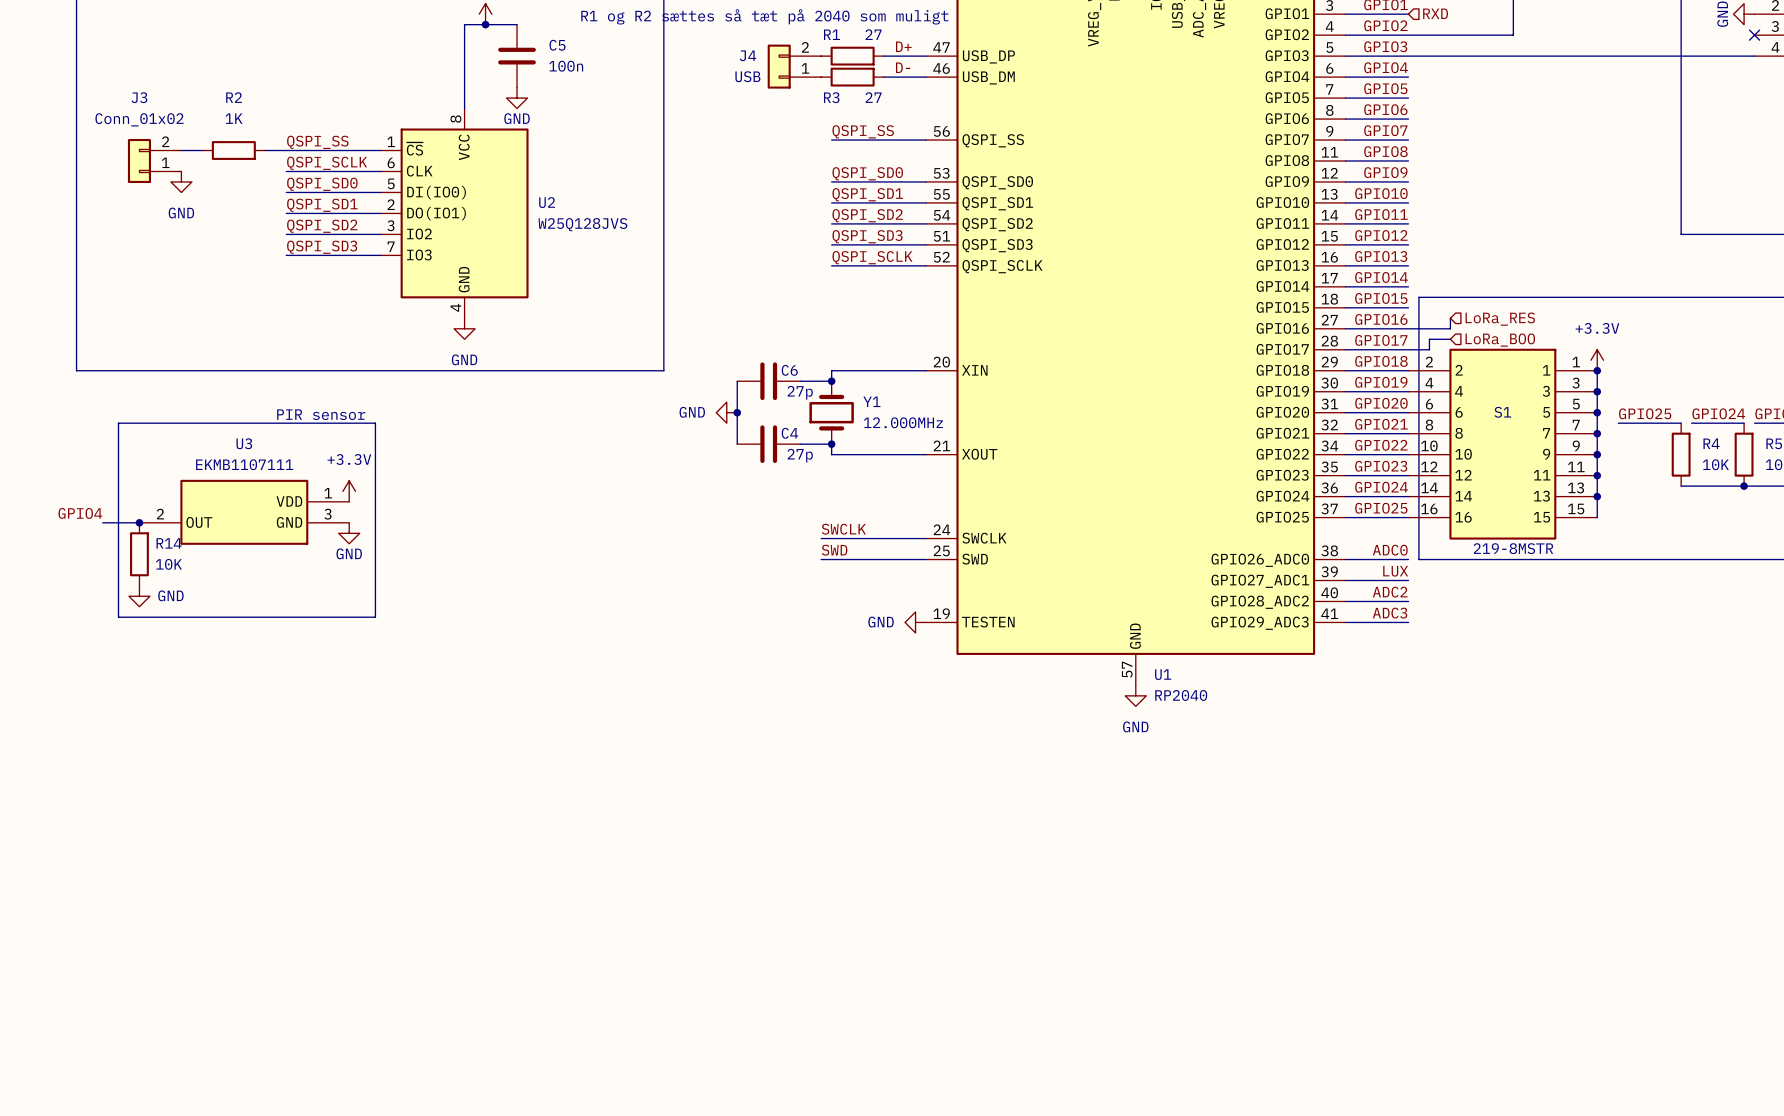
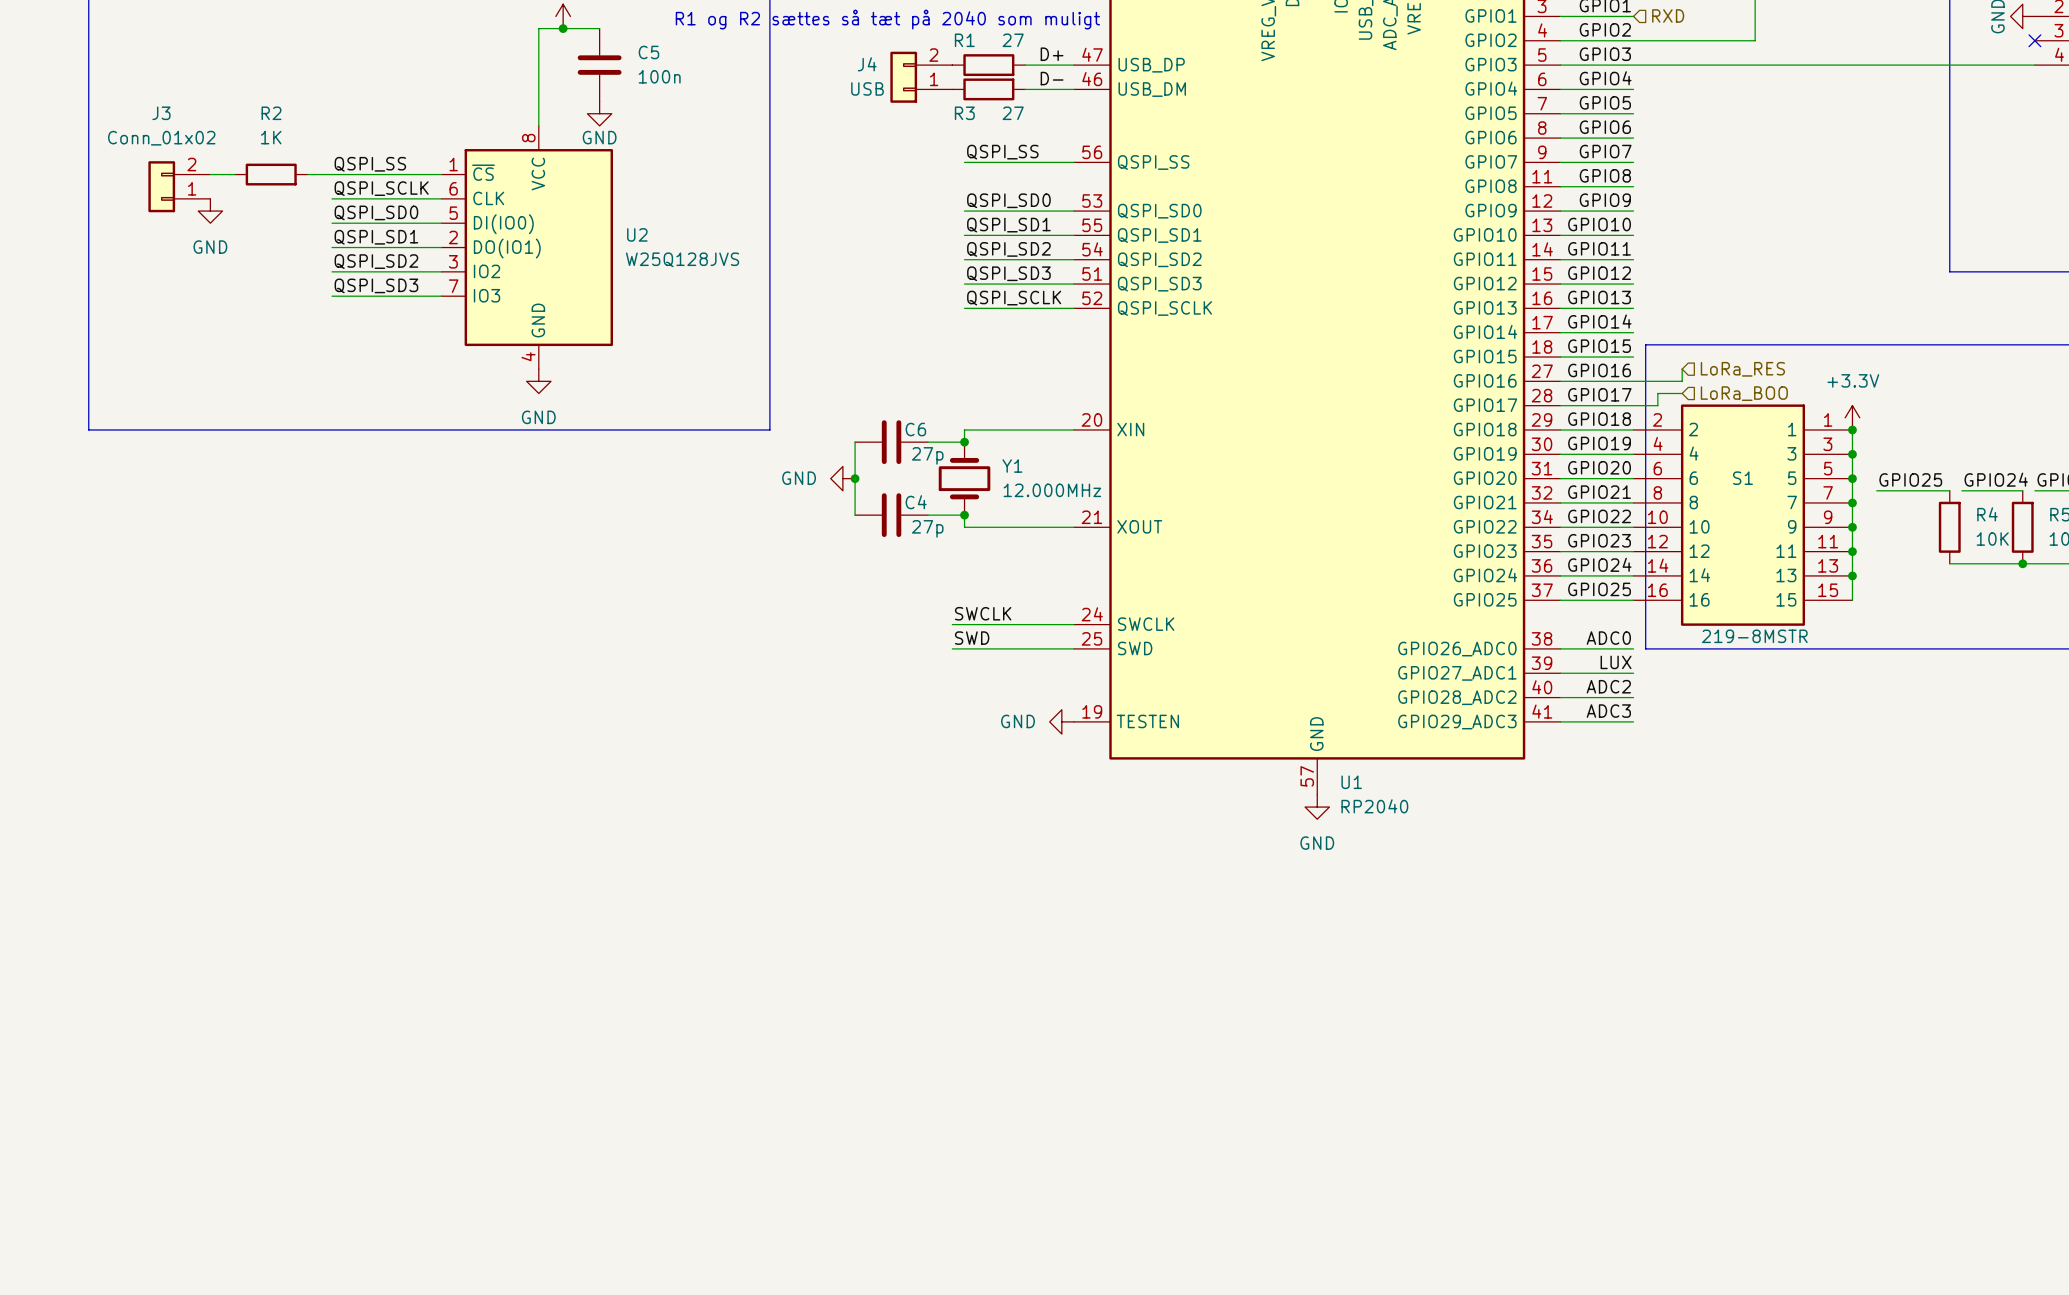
text: PIR sensor (321, 414) -> none
line: (118, 423) (375, 423) (375, 617) (118, 617) (118, 423) -> none
power symbol: +3.3V (349, 491) -> none
U3: EKMB1107111 (244, 512) -> none
label: GPIO4 (80, 513) -> none
wire: (102, 522) (139, 522) -> none
junction: (139, 522) -> none
power symbol: GND (349, 533) -> none
R14: 10K (139, 554) -> none
power symbol: GND (139, 596) -> none

